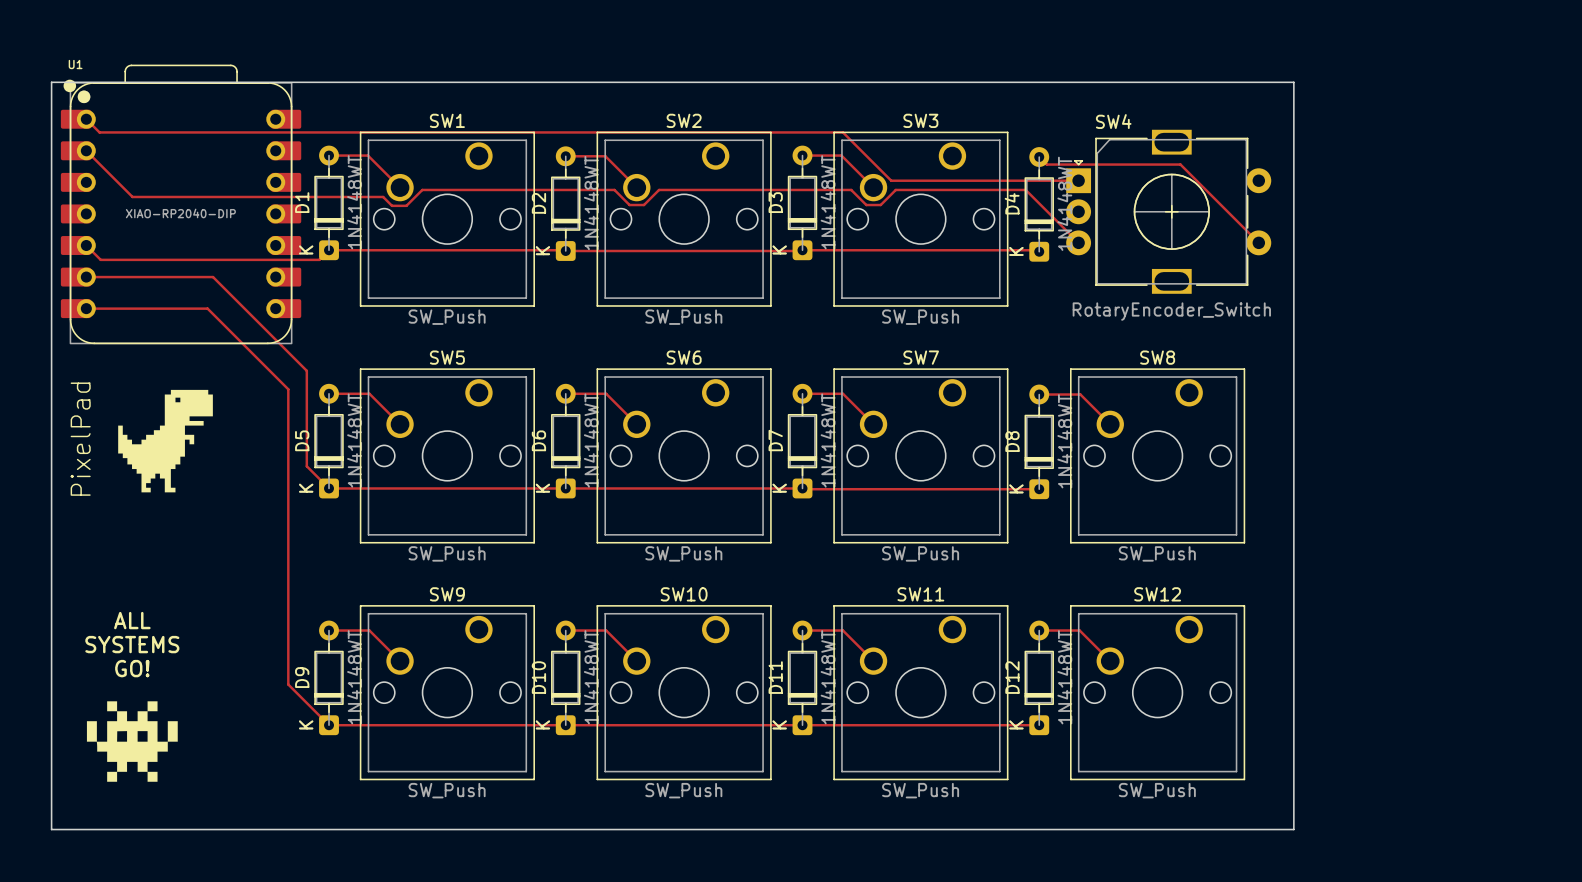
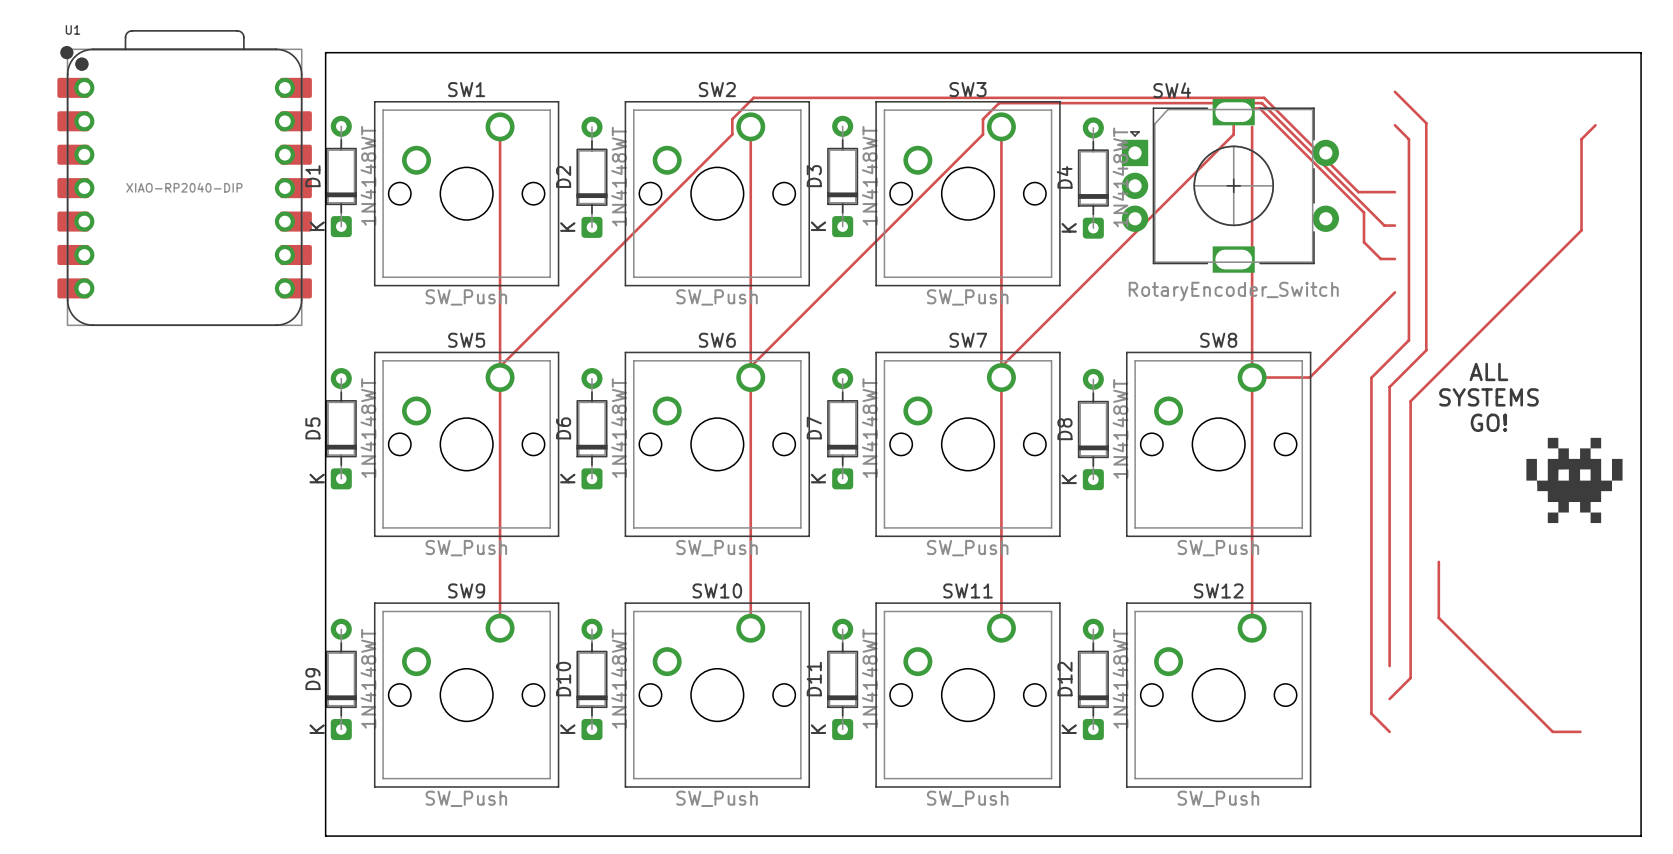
board edge: (51, 82) (1293, 82) (1293, 829) (51, 829) (51, 82) -> (325, 52) (325, 836) (1641, 836) (1641, 52) (325, 52)
track: (86, 119) (99, 132) (842, 132) (891, 180) (1078, 180) -> none
track: none -> (1394, 91) (1426, 123) (1426, 350) (1389, 387) (1389, 666)
track: (86, 150) (132, 196) (383, 196) (392, 205) (406, 205) (422, 189) (614, 189) (629, 205) (643, 205) (659, 189) (851, 189) (866, 205) (880, 205) (895, 189) (1025, 189) (1078, 242) -> none
track: none -> (1394, 125) (1408, 139) (1408, 340) (1371, 377) (1371, 713) (1389, 731)
track: none -> (1595, 125) (1581, 139) (1581, 230) (1410, 401) (1410, 677) (1389, 698)
track: (329, 155) (367, 155) (400, 187) -> none
track: (802, 155) (841, 155) (873, 187) -> none
track: none -> (500, 126) (500, 628)
track: (565, 156) (605, 156) (636, 187) -> none
track: none -> (750, 126) (750, 628)
track: none -> (1001, 126) (1001, 628)
track: none -> (1252, 126) (1252, 628)
track: (1039, 157) (1046, 164) (1180, 164) (1258, 242) -> none
track: none -> (1394, 192) (1358, 192) (1264, 97) (753, 97) (732, 119) (732, 134) (500, 366)
track: (86, 245) (100, 259) (319, 259) (329, 250) (1039, 251) -> none
track: none -> (1394, 225) (1384, 225) (1261, 103) (999, 103) (982, 119) (982, 134) (750, 366)
track: (86, 277) (213, 277) (306, 370) (306, 466) (329, 488) (1039, 489) -> none
track: none -> (1394, 258) (1380, 258) (1364, 242) (1364, 212) (1259, 108) (1244, 108) (1233, 119) (1233, 134) (1001, 366)
track: (86, 308) (207, 308) (288, 389) (288, 684) (329, 725) (1039, 725) -> none
track: none -> (1394, 292) (1309, 377) (1252, 377)
text: none -> ALL (1488, 371)
drawing: [118, 389, 213, 493] -> none
track: (329, 393) (369, 393) (400, 424) -> none
track: (565, 393) (606, 393) (636, 424) -> none
track: (802, 393) (842, 393) (873, 424) -> none
track: (1039, 394) (1080, 394) (1110, 424) -> none
text: none -> SYSTEMS (1488, 397)
text: none -> GO! (1488, 422)
text: PixelPad (80, 439) -> none
drawing: none -> [1526, 437, 1623, 524]
track: none -> (1438, 561) (1438, 617) (1552, 731) (1580, 731)
text: ALL (132, 620) -> none
track: (329, 630) (369, 630) (400, 661) -> none
track: (565, 630) (606, 630) (636, 661) -> none
track: (802, 630) (842, 630) (873, 661) -> none
track: (1039, 630) (1079, 630) (1110, 661) -> none
text: SYSTEMS (132, 644) -> none
text: GO! (132, 668) -> none
drawing: [86, 701, 178, 782] -> none

